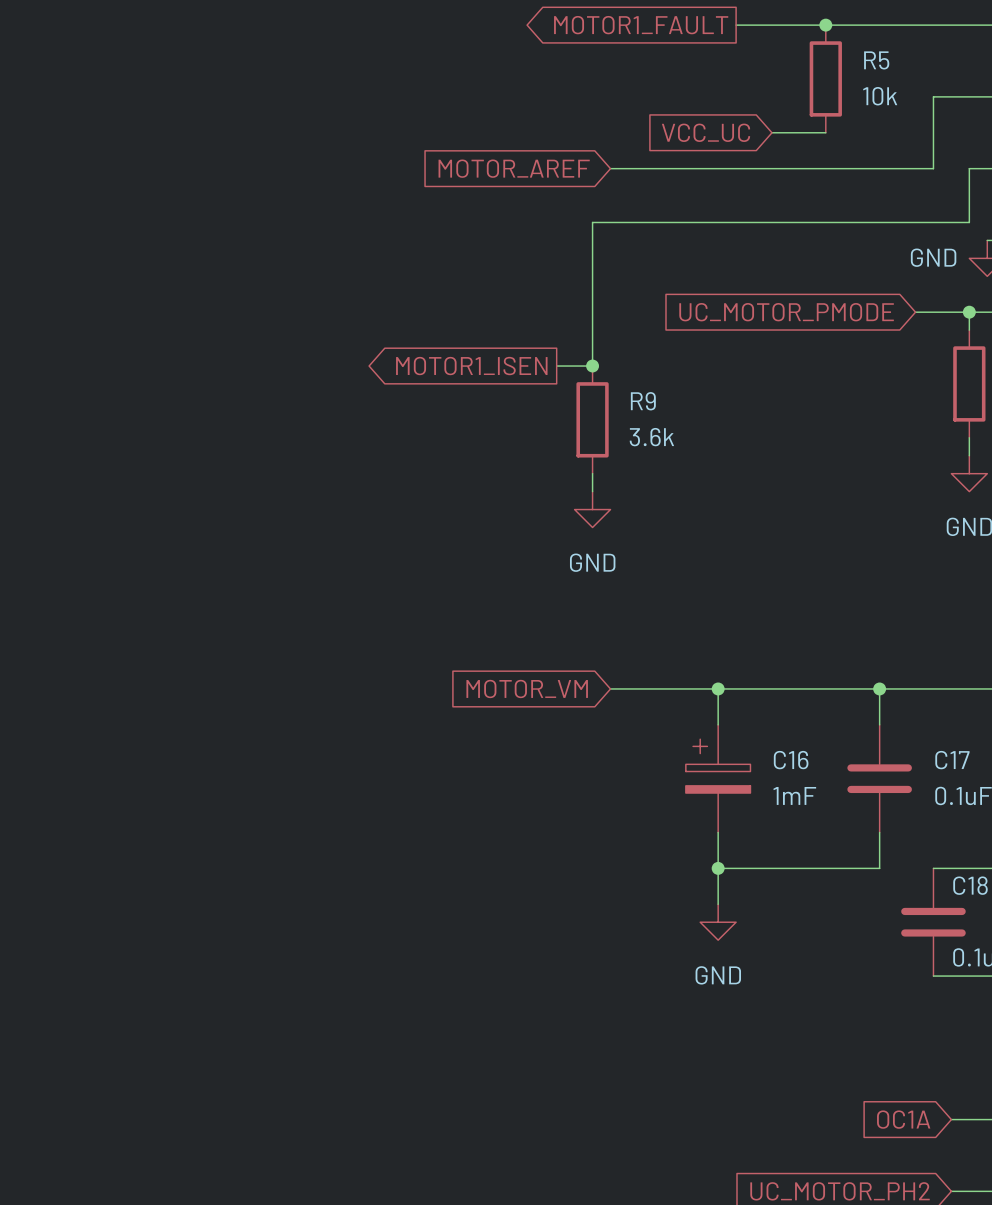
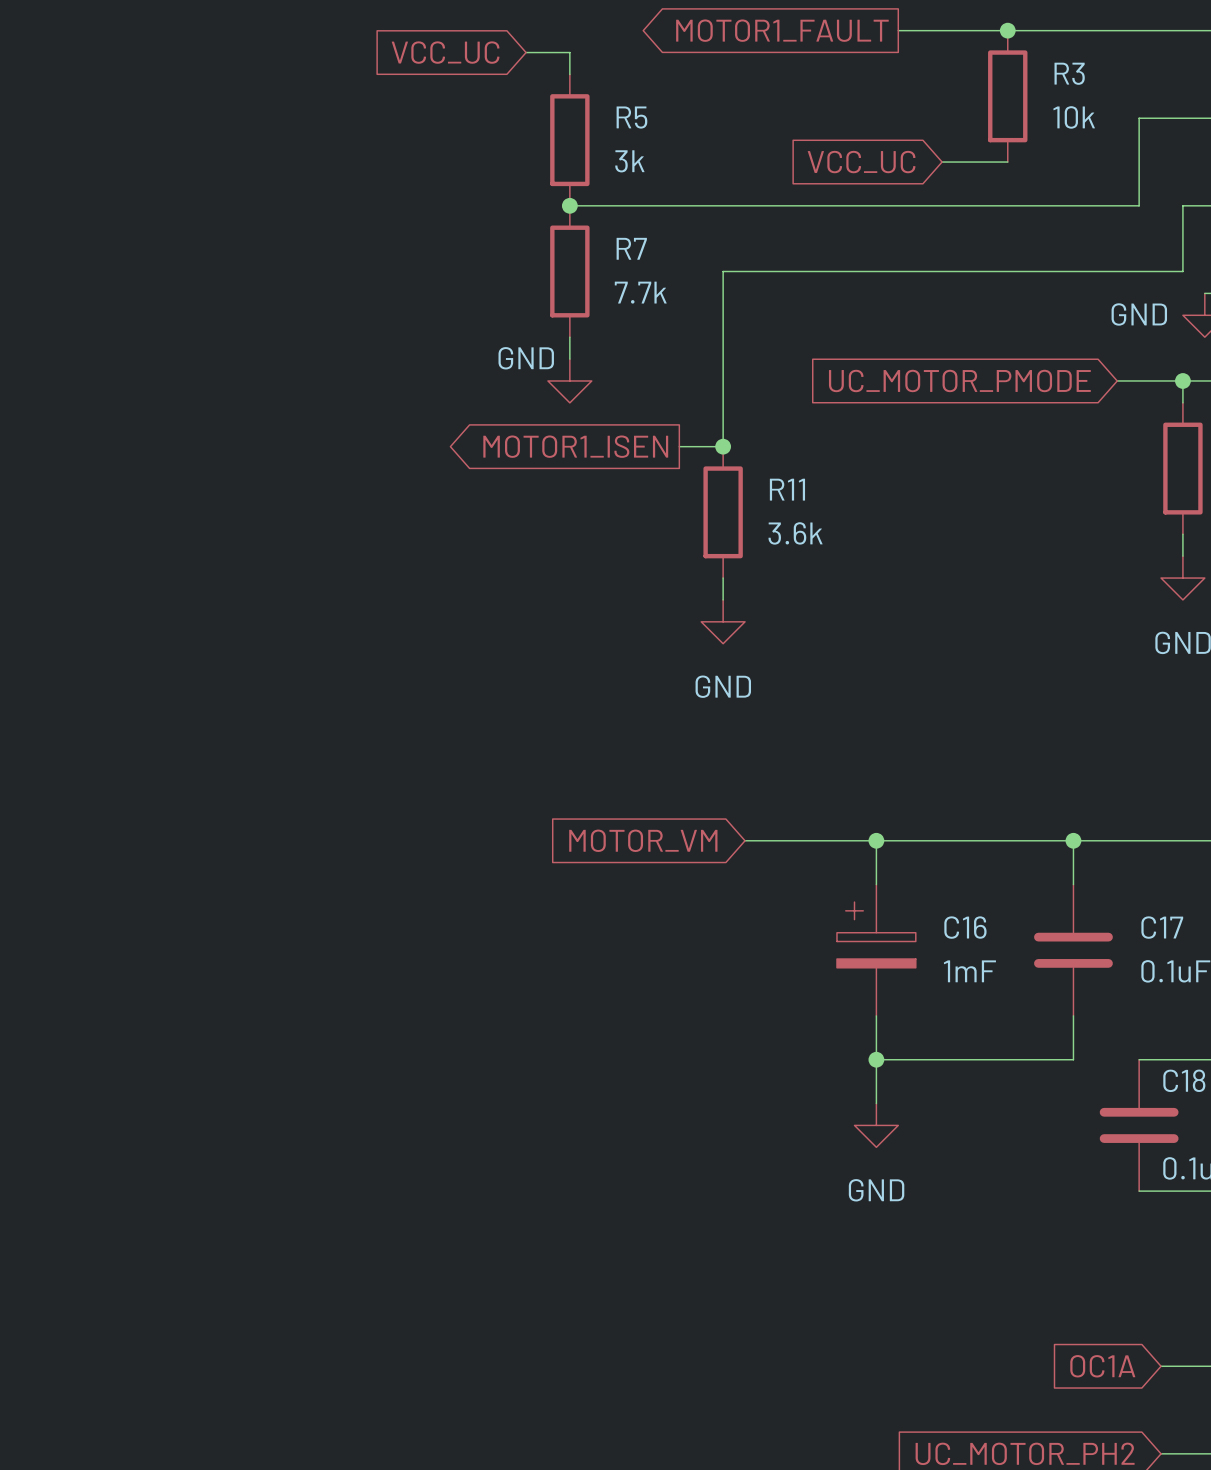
global label: none -> VCC_UC (445, 52)
wire: none -> (526, 52) (569, 52) (569, 74)
R5 name: R5 (876, 60) -> R3 (1069, 73)
R5: none -> 3k (569, 140)
wire: none -> (569, 205) (745, 205)
junction: none -> (569, 205)
global label: MOTOR_AREF (514, 168) -> none
R7: none -> 7.7k (569, 271)
wire: none -> (569, 337) (569, 359)
power symbol: none -> GND (569, 380)
R9 name: R9 (643, 401) -> R11 (787, 489)

